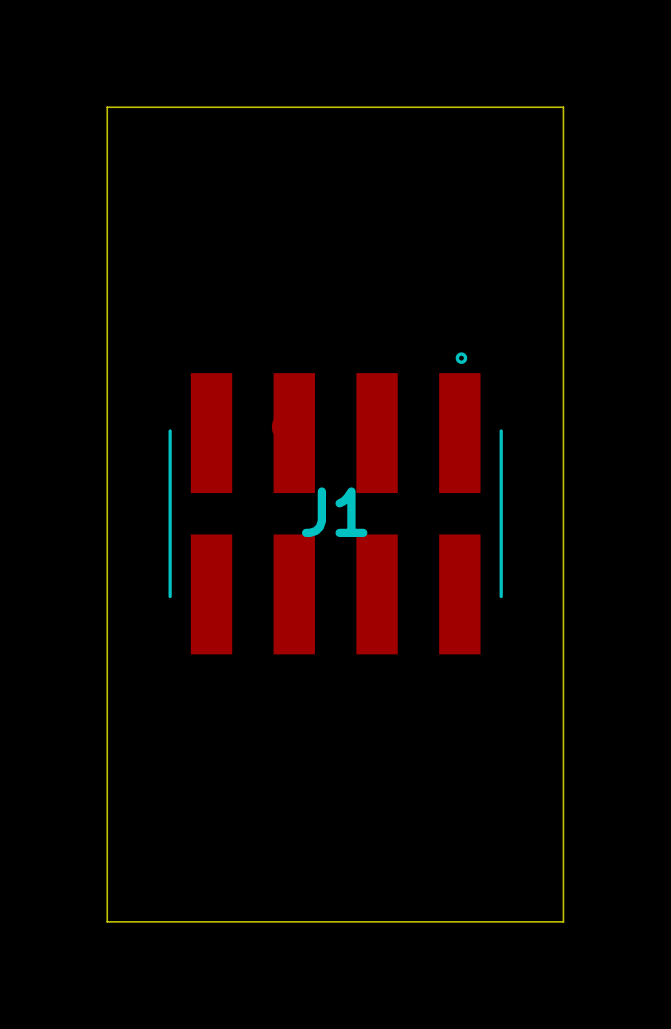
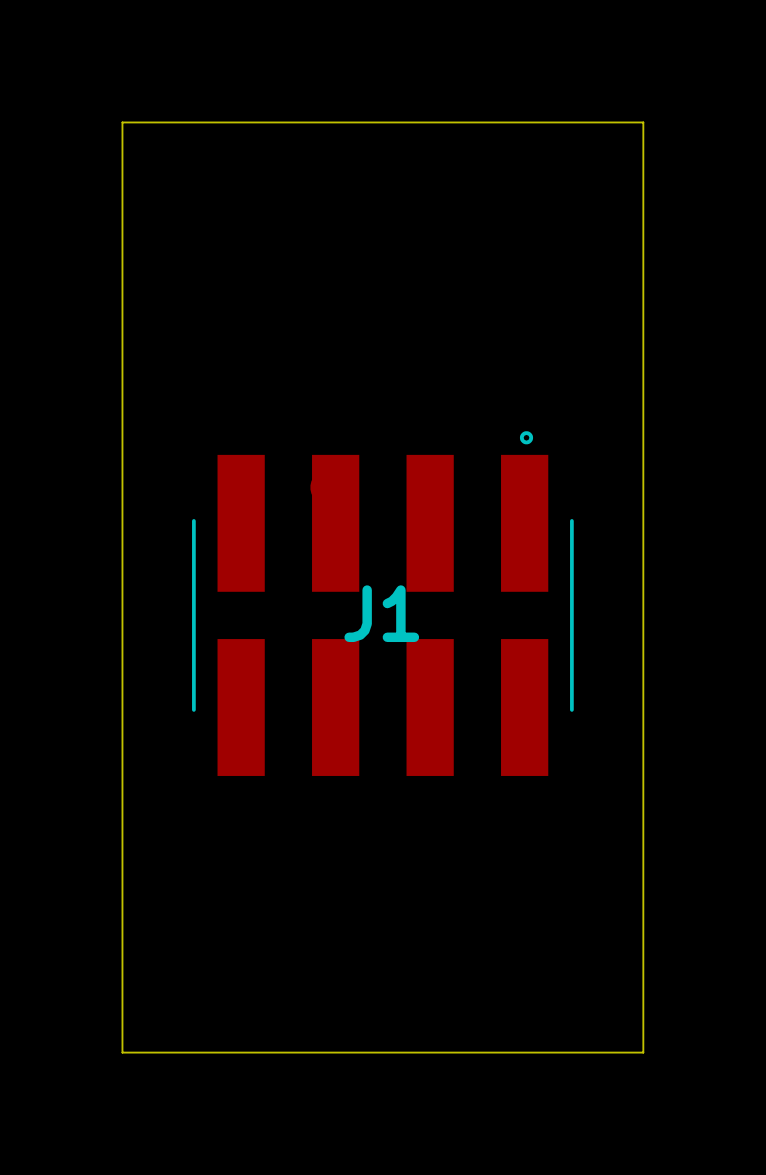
J1 position: (335, 503) -> (382, 603)

